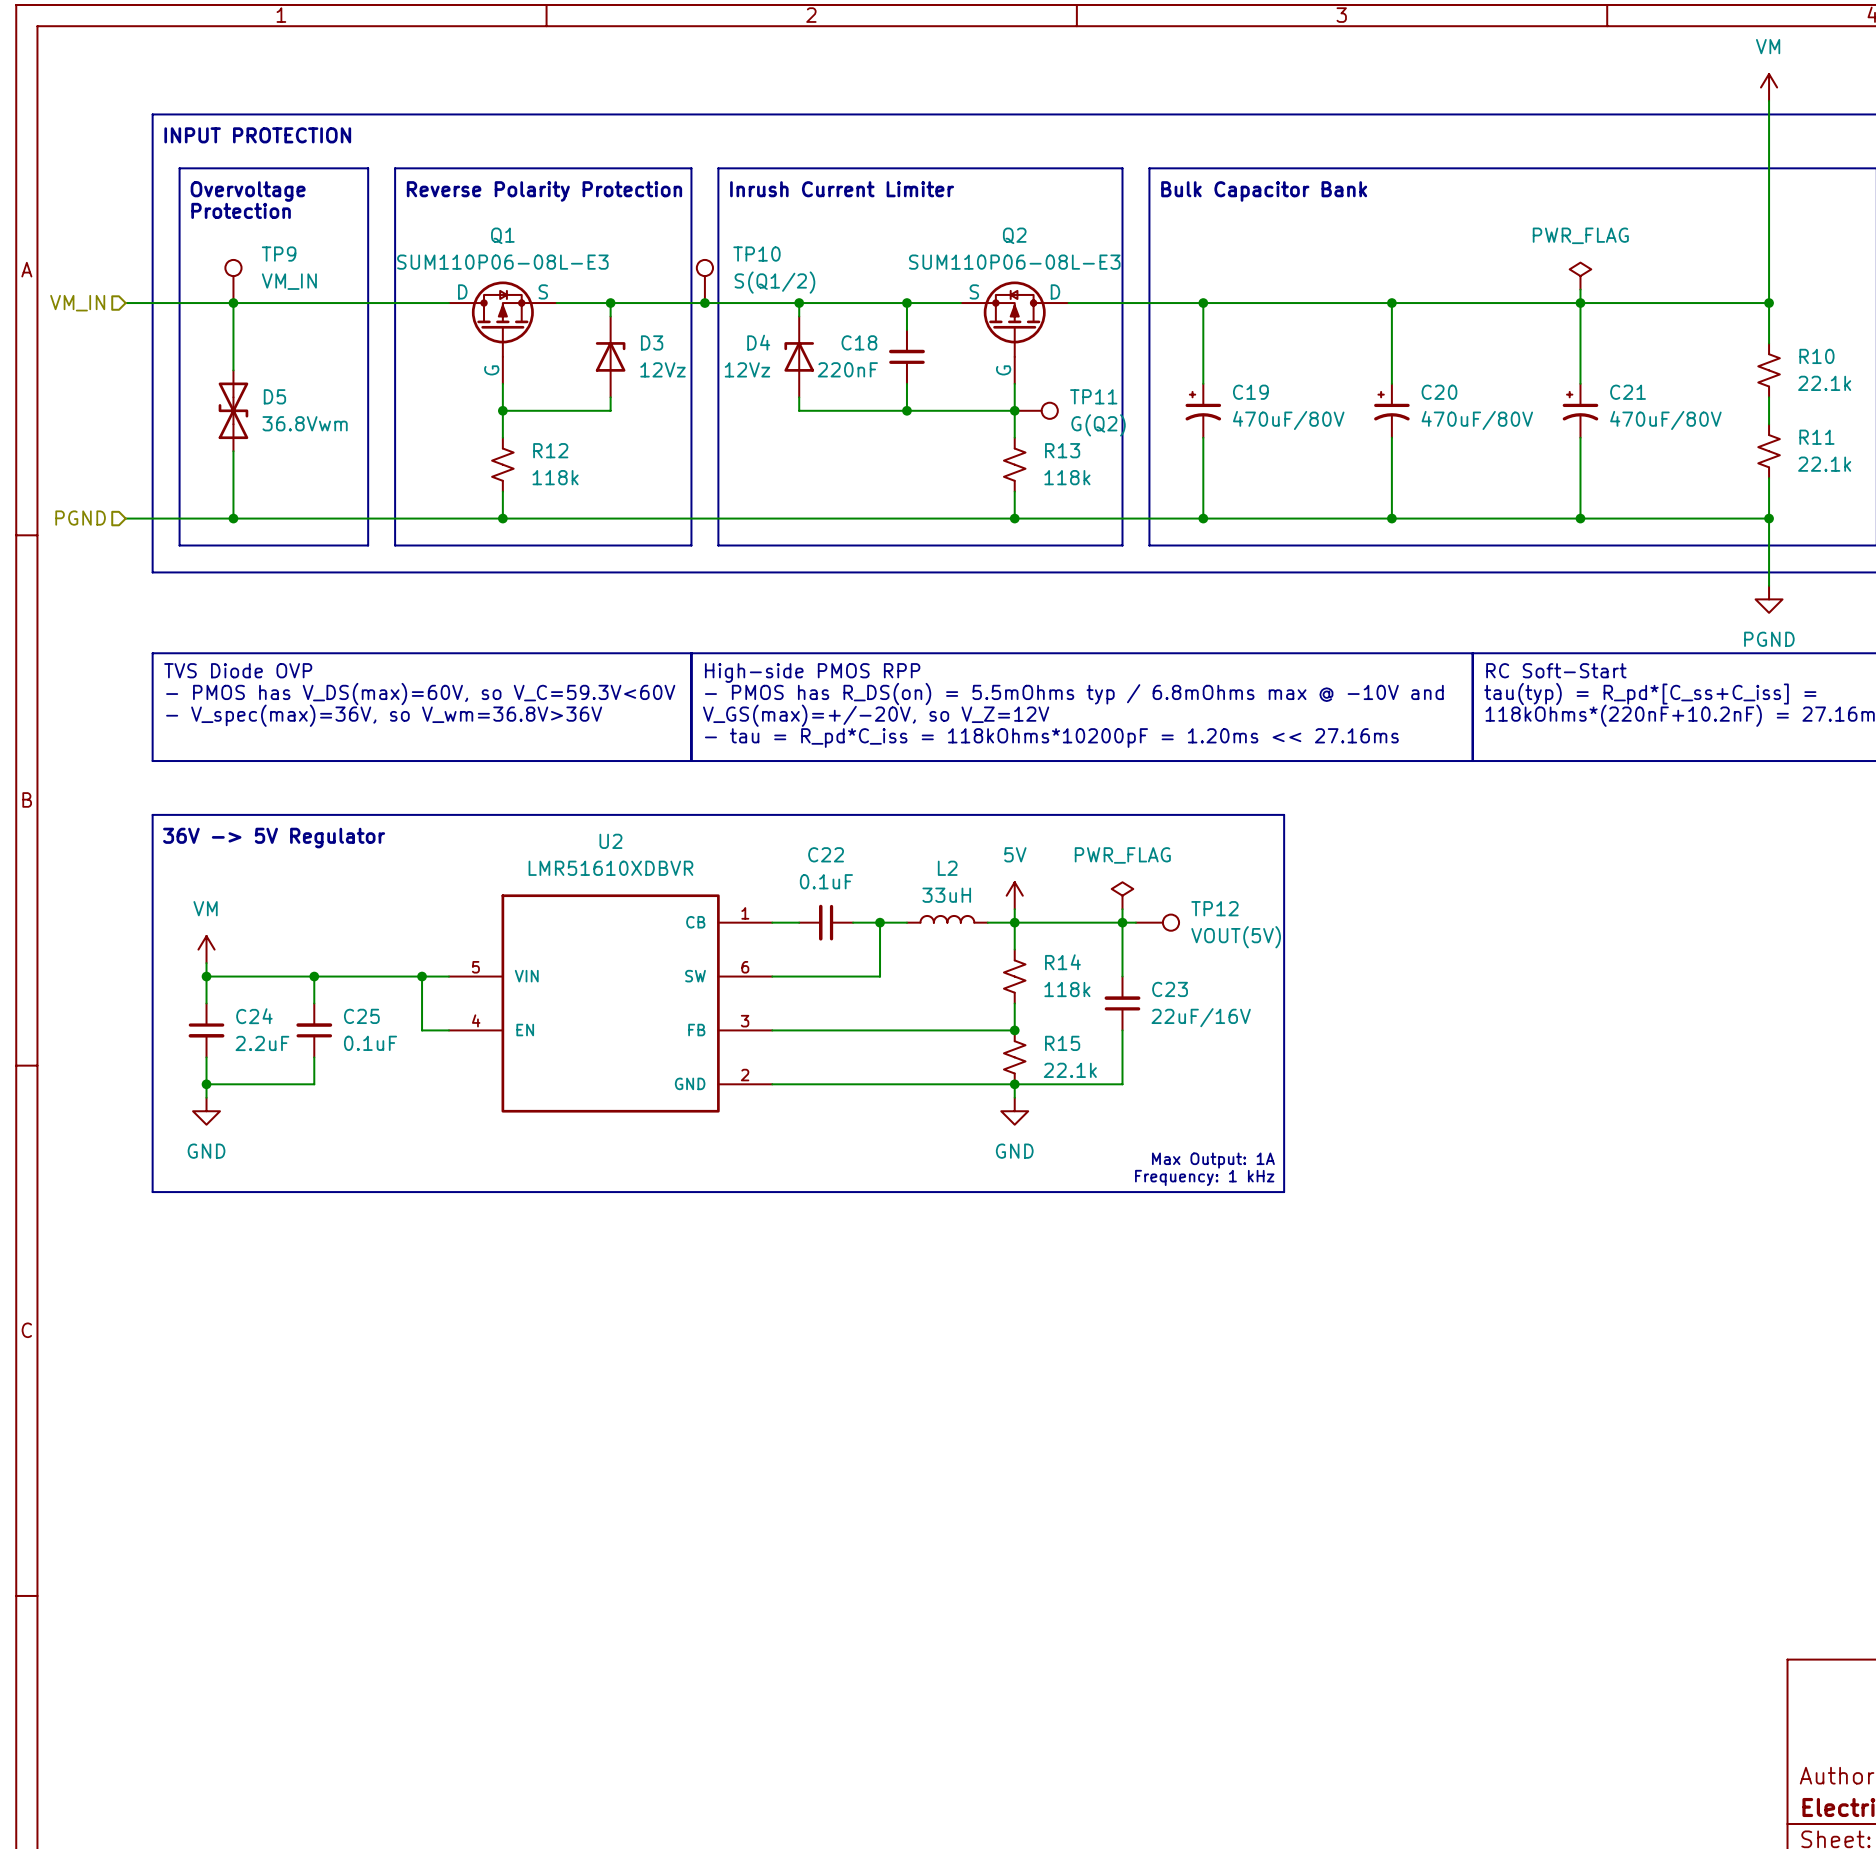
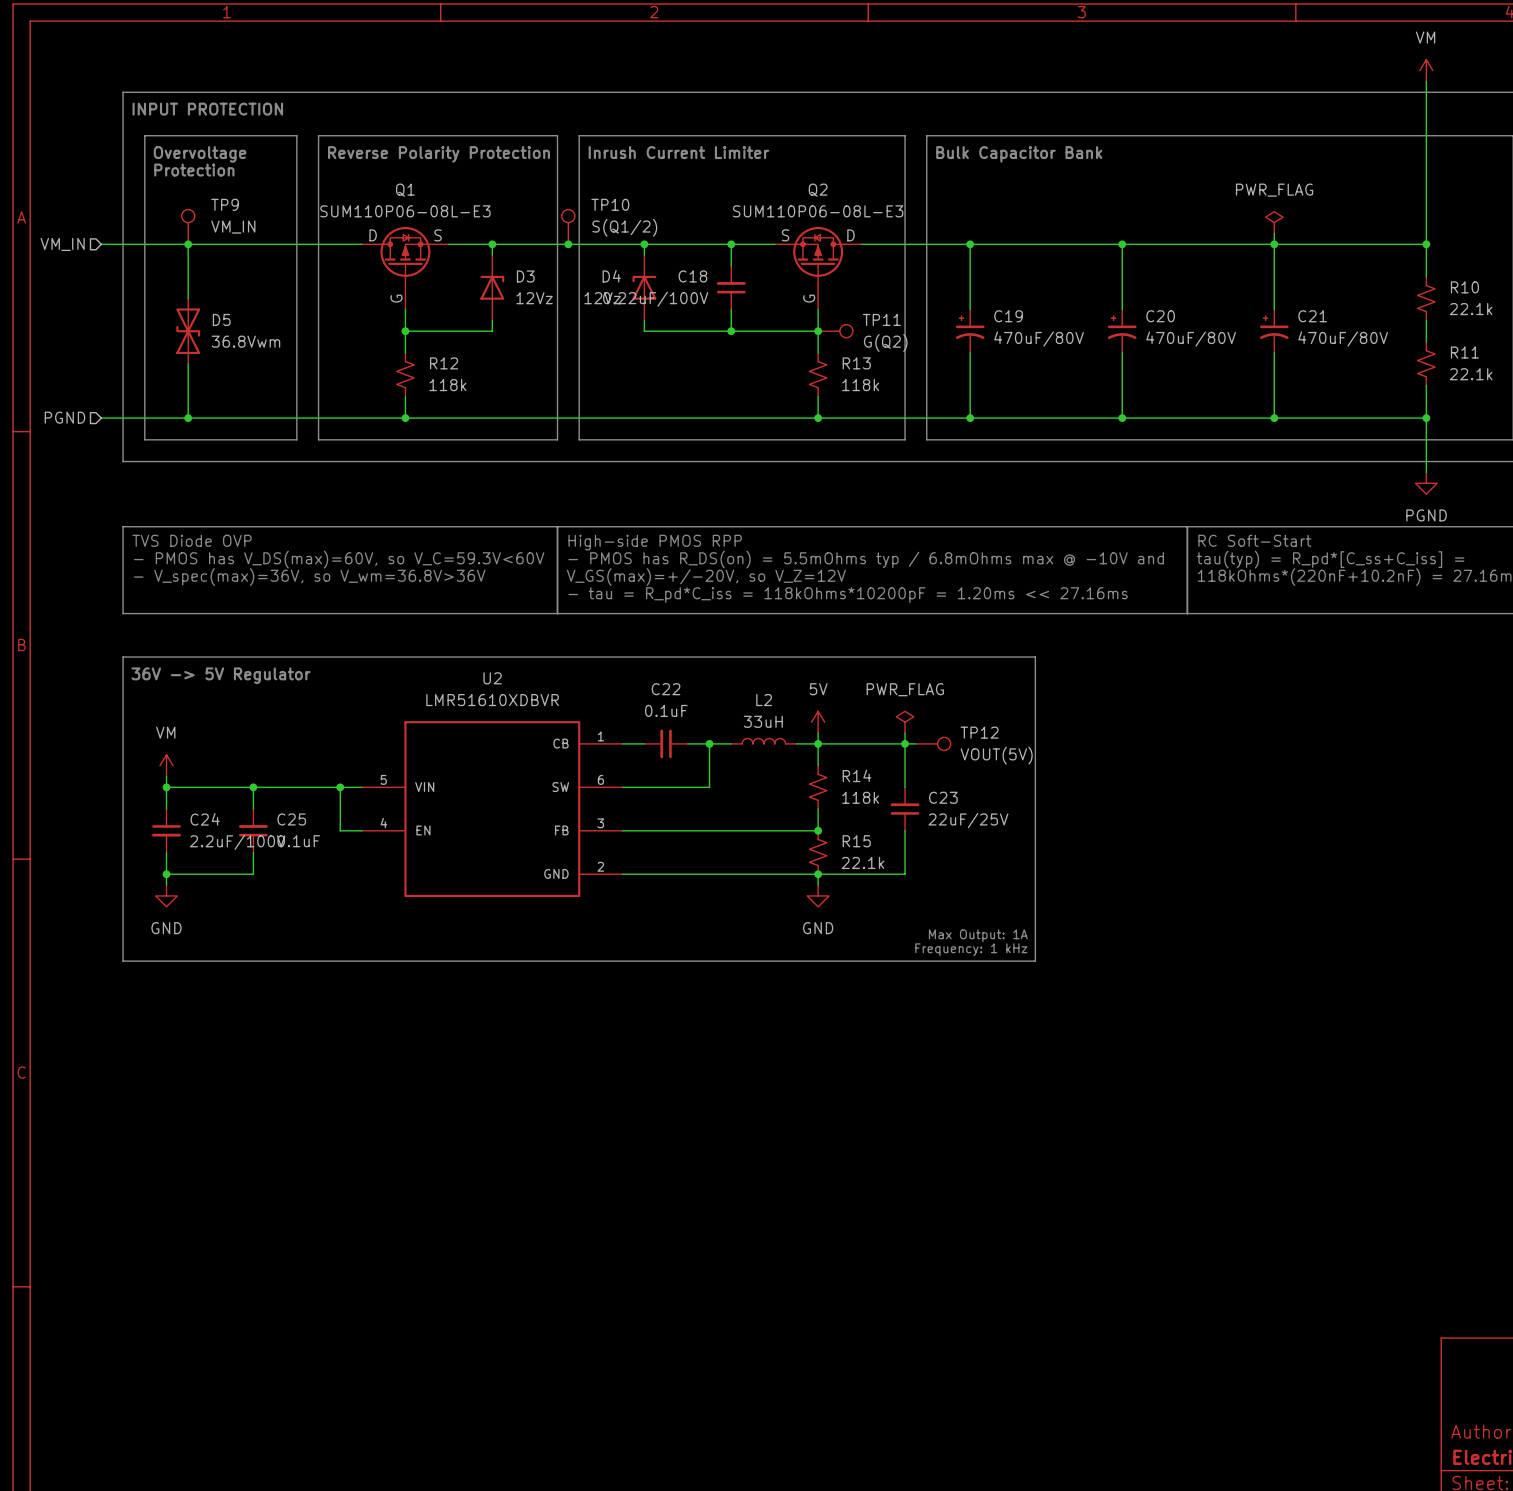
C18 value: 220nF (847, 369) -> 0.22uF/100V (655, 299)
C23 value: 22uF/16V (1201, 1017) -> 22uF/25V (968, 820)
C24 value: 2.2uF (262, 1043) -> 2.2uF/100V (237, 842)

